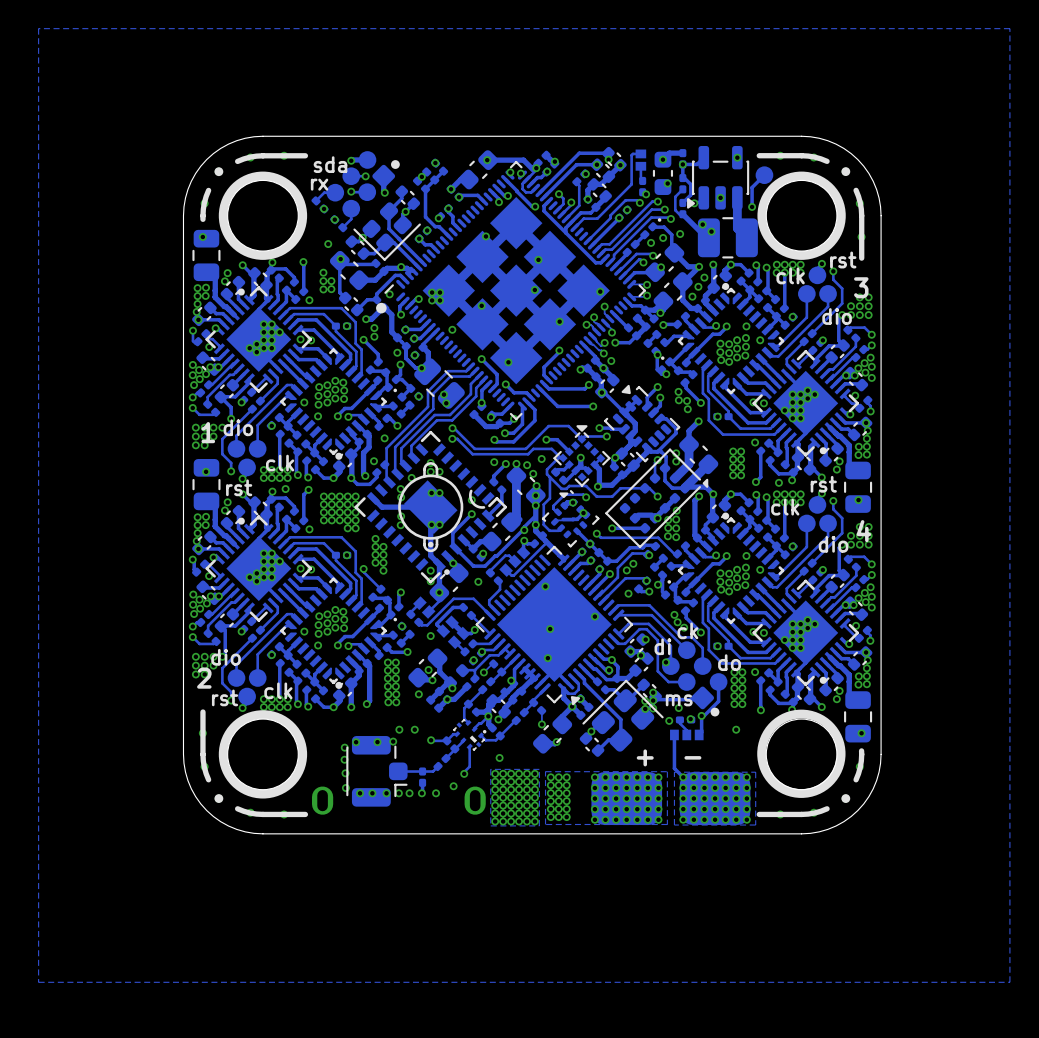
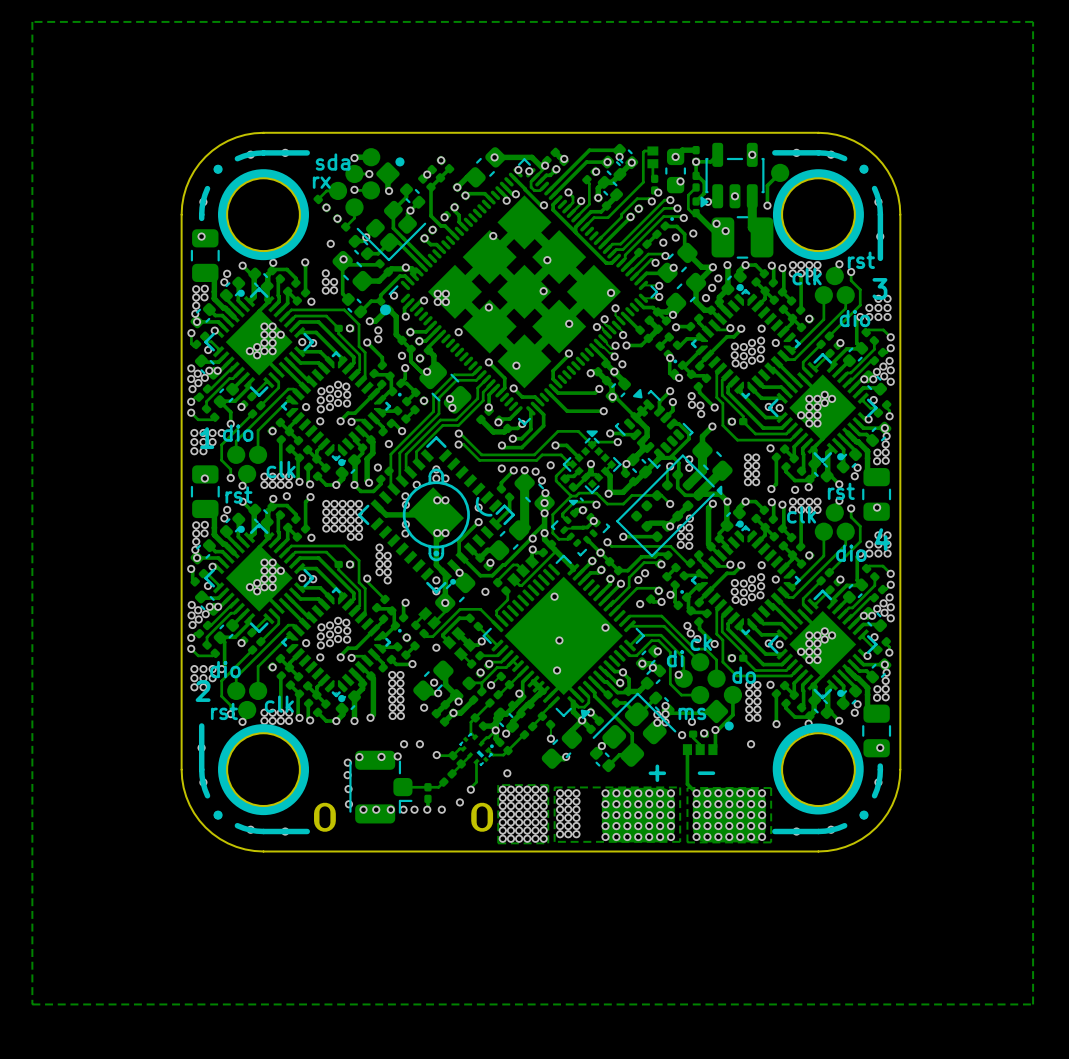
track: (549, 477) (549, 498) (543, 506) -> (571, 496) (552, 514)

